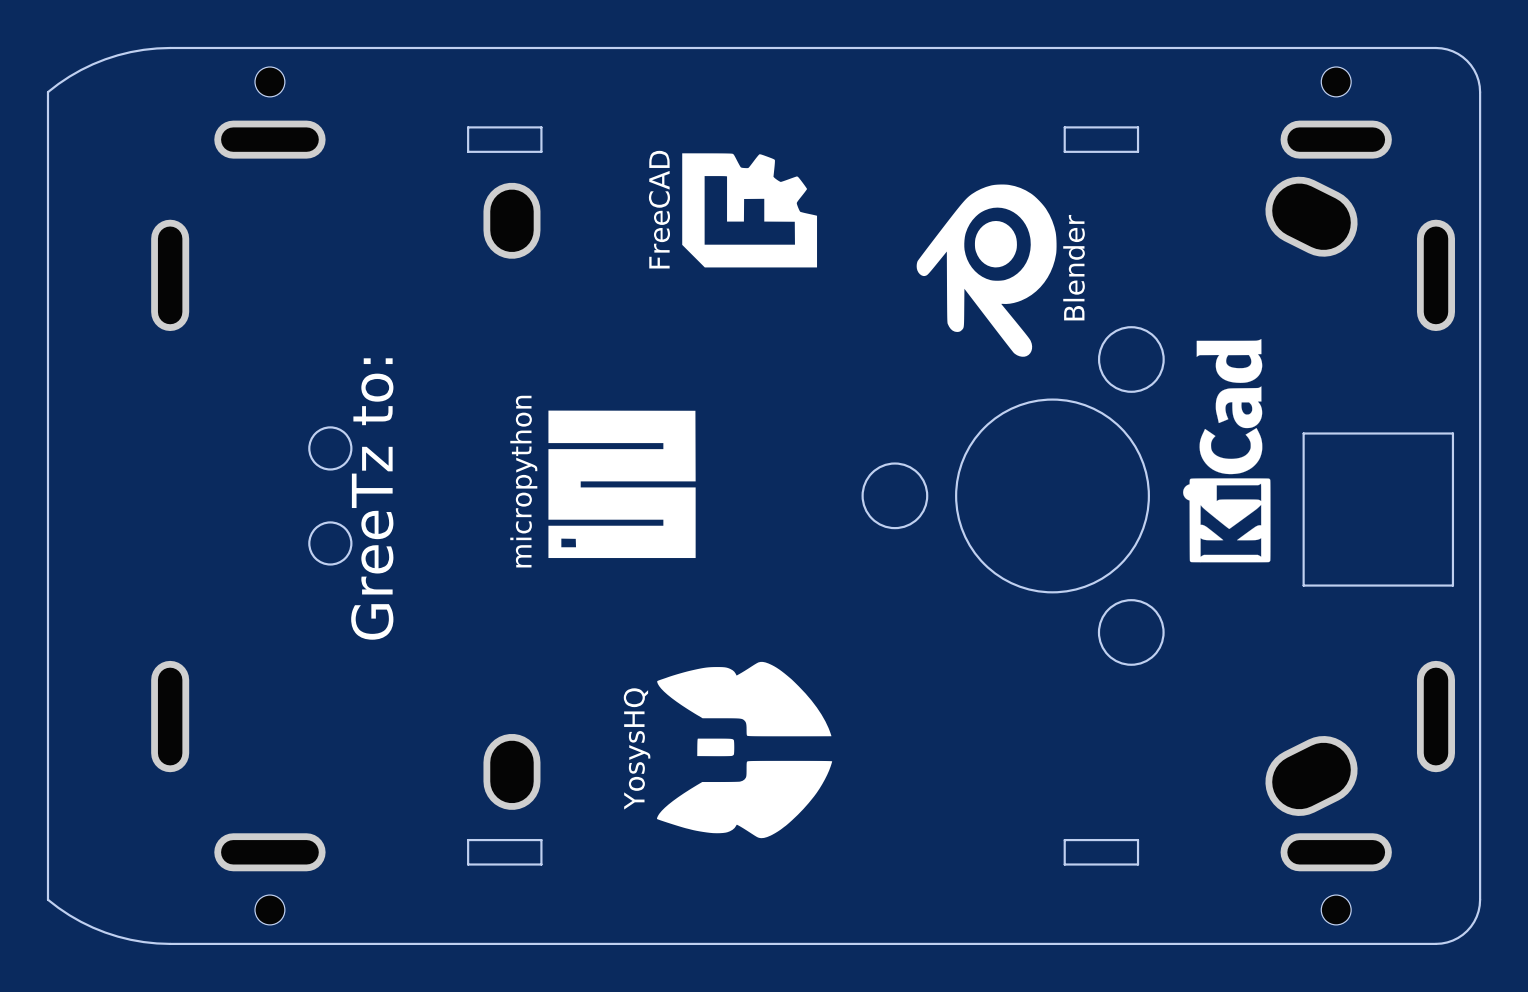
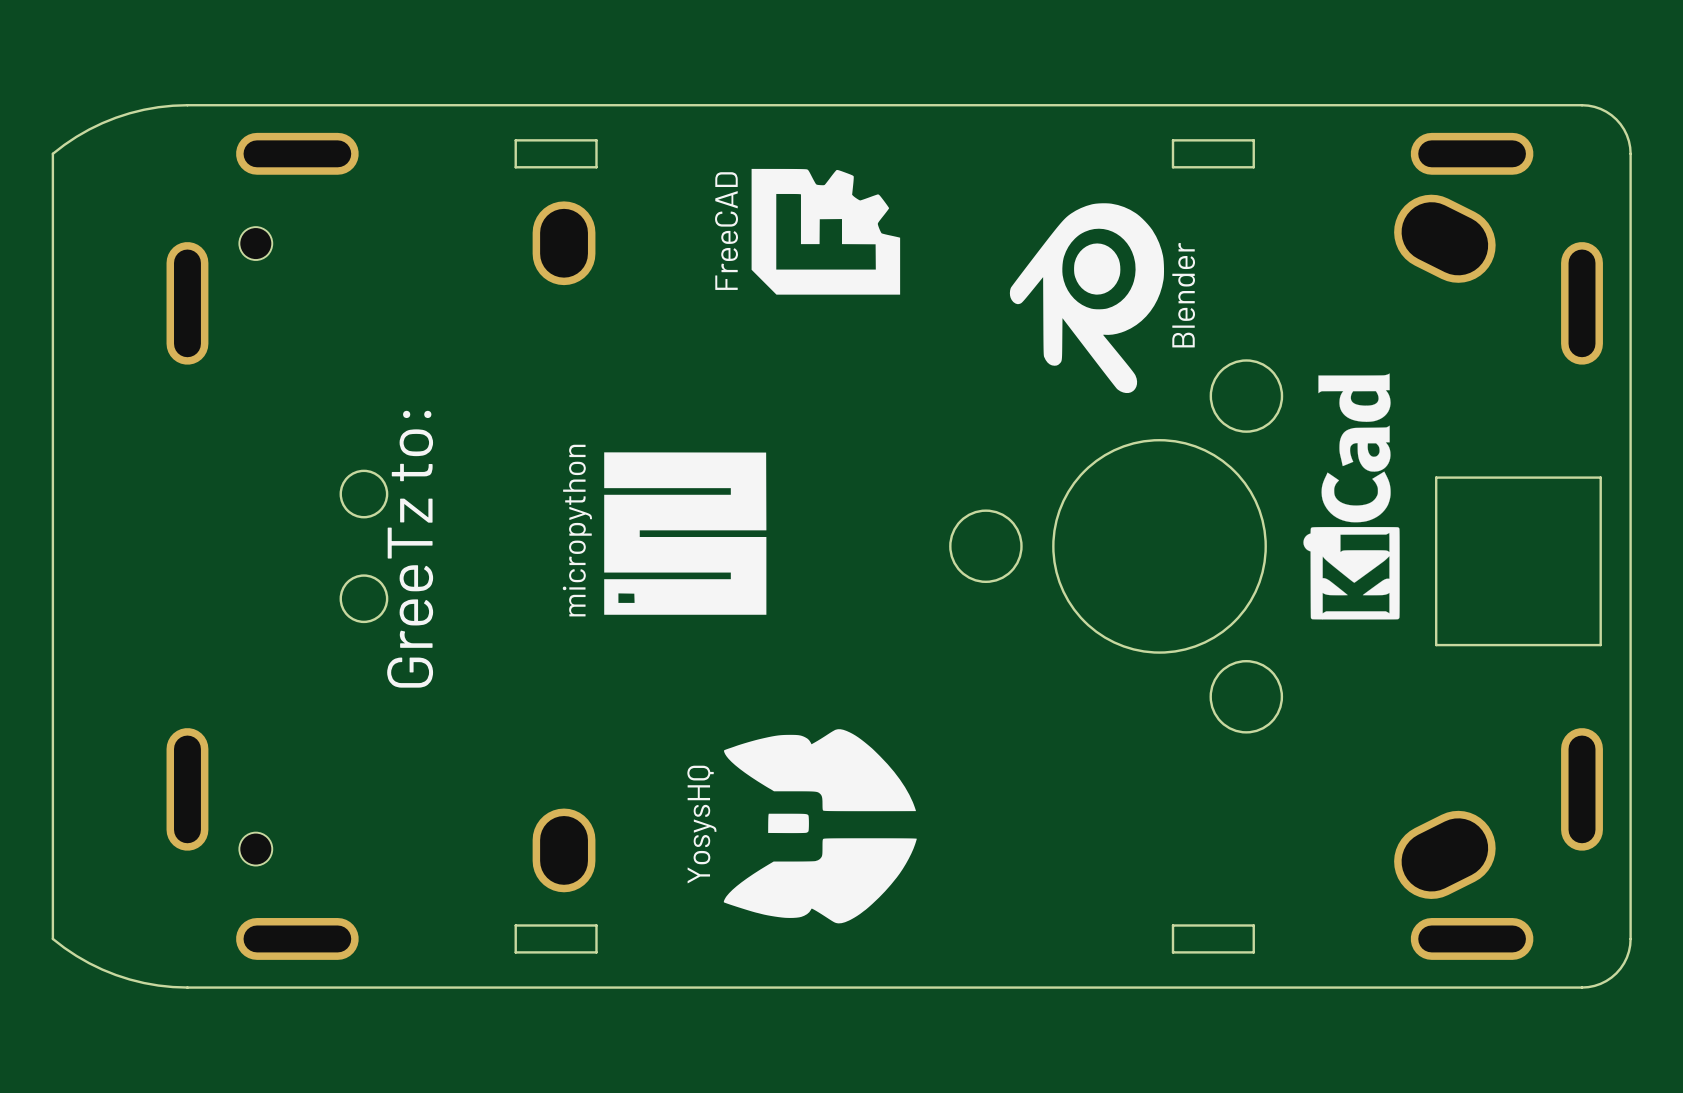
part position: (269, 81) -> (255, 243)
part: (1336, 81) -> none
board edge: (1480, 139) (1480, 92) (1476, 75) (1470, 65) (1462, 57) (1452, 51) (1435, 47) (156, 48) (130, 52) (105, 59) (80, 70) (47, 92) (47, 139) -> (1630, 153) (1626, 135) (1616, 119) (1600, 108) (1582, 105) (187, 105) (158, 107) (115, 117) (76, 136) (52, 153)
board edge: (1480, 852) (1480, 899) (1476, 916) (1467, 930) (1458, 938) (1447, 942) (1435, 943) (156, 943) (130, 939) (105, 932) (80, 921) (47, 899) (47, 852) -> (1630, 938) (1626, 957) (1616, 973) (1600, 983) (1582, 987) (187, 987) (158, 985) (115, 975) (76, 955) (52, 938)
part position: (269, 909) -> (255, 849)
part: (1336, 909) -> none

